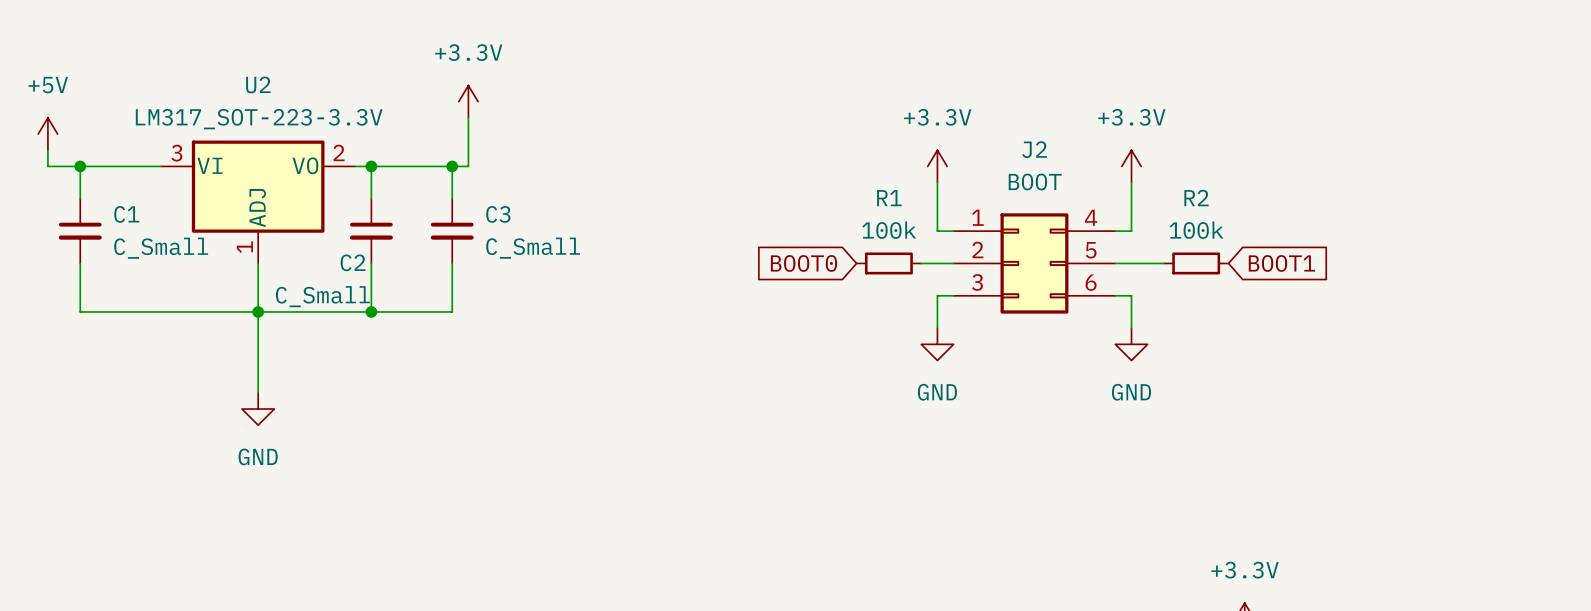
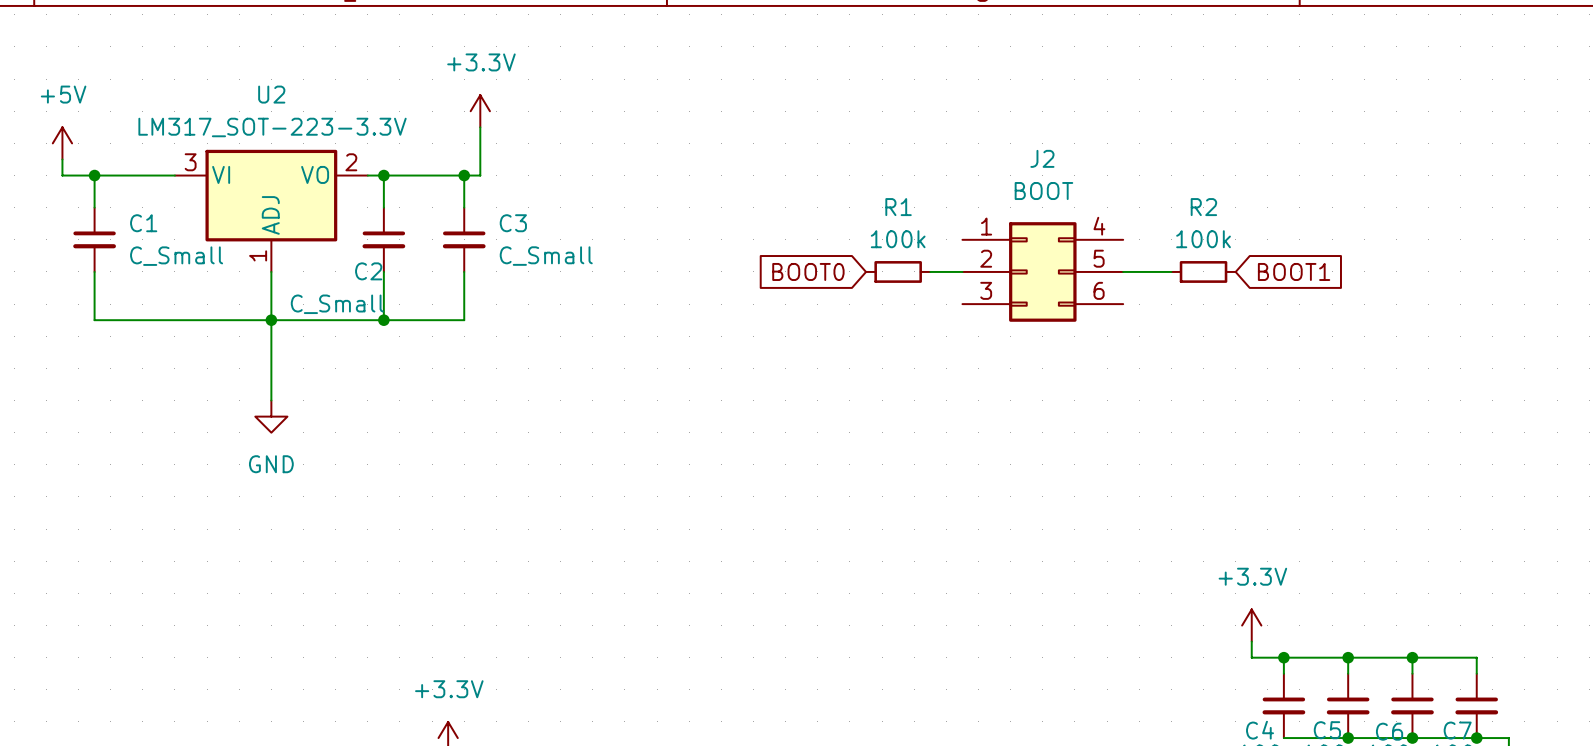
power symbol: +3.3V (937, 166) -> none
power symbol: +3.3V (1131, 166) -> none
wire: (937, 182) (937, 231) (953, 231) -> none
wire: (1131, 182) (1131, 231) (1115, 231) -> none
wire: (953, 295) (937, 295) (937, 328) -> none
wire: (1115, 295) (1131, 295) (1131, 328) -> none
power symbol: GND (937, 344) -> none
power symbol: GND (1131, 344) -> none

